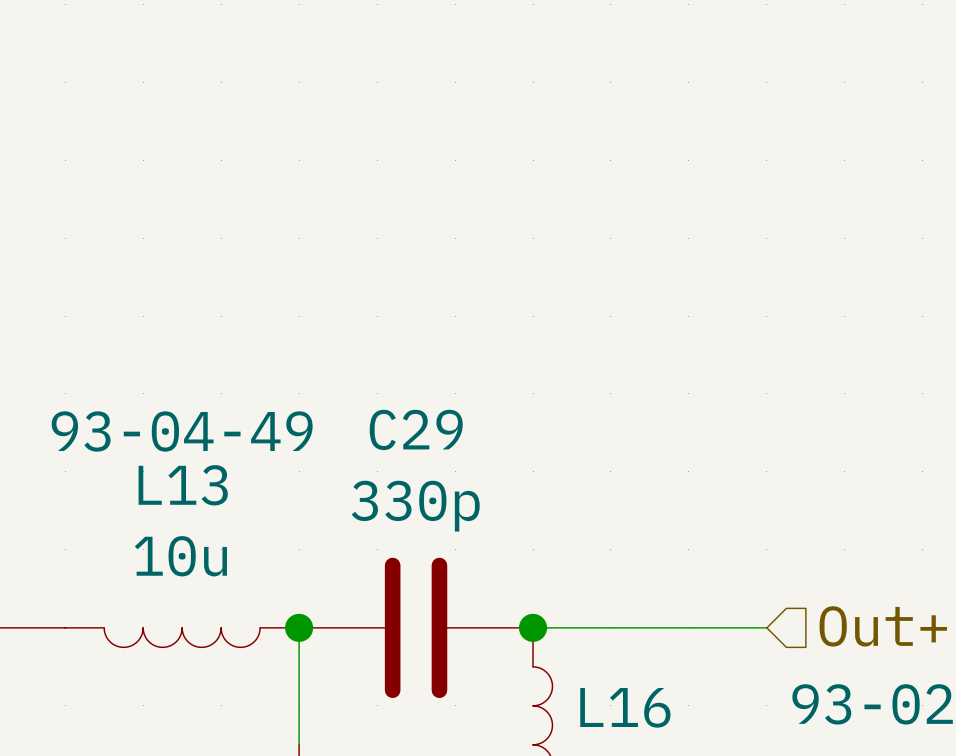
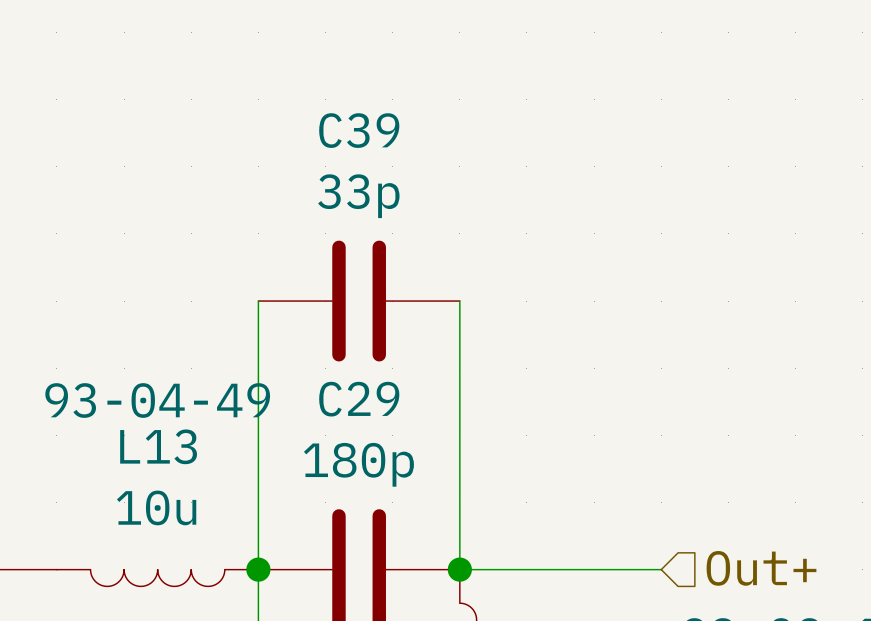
wire: none -> (258, 301) (258, 569)
C39: none -> 33p (359, 301)
wire: none -> (459, 301) (459, 569)
C29 value: 330p (415, 506) -> 180p (358, 464)

